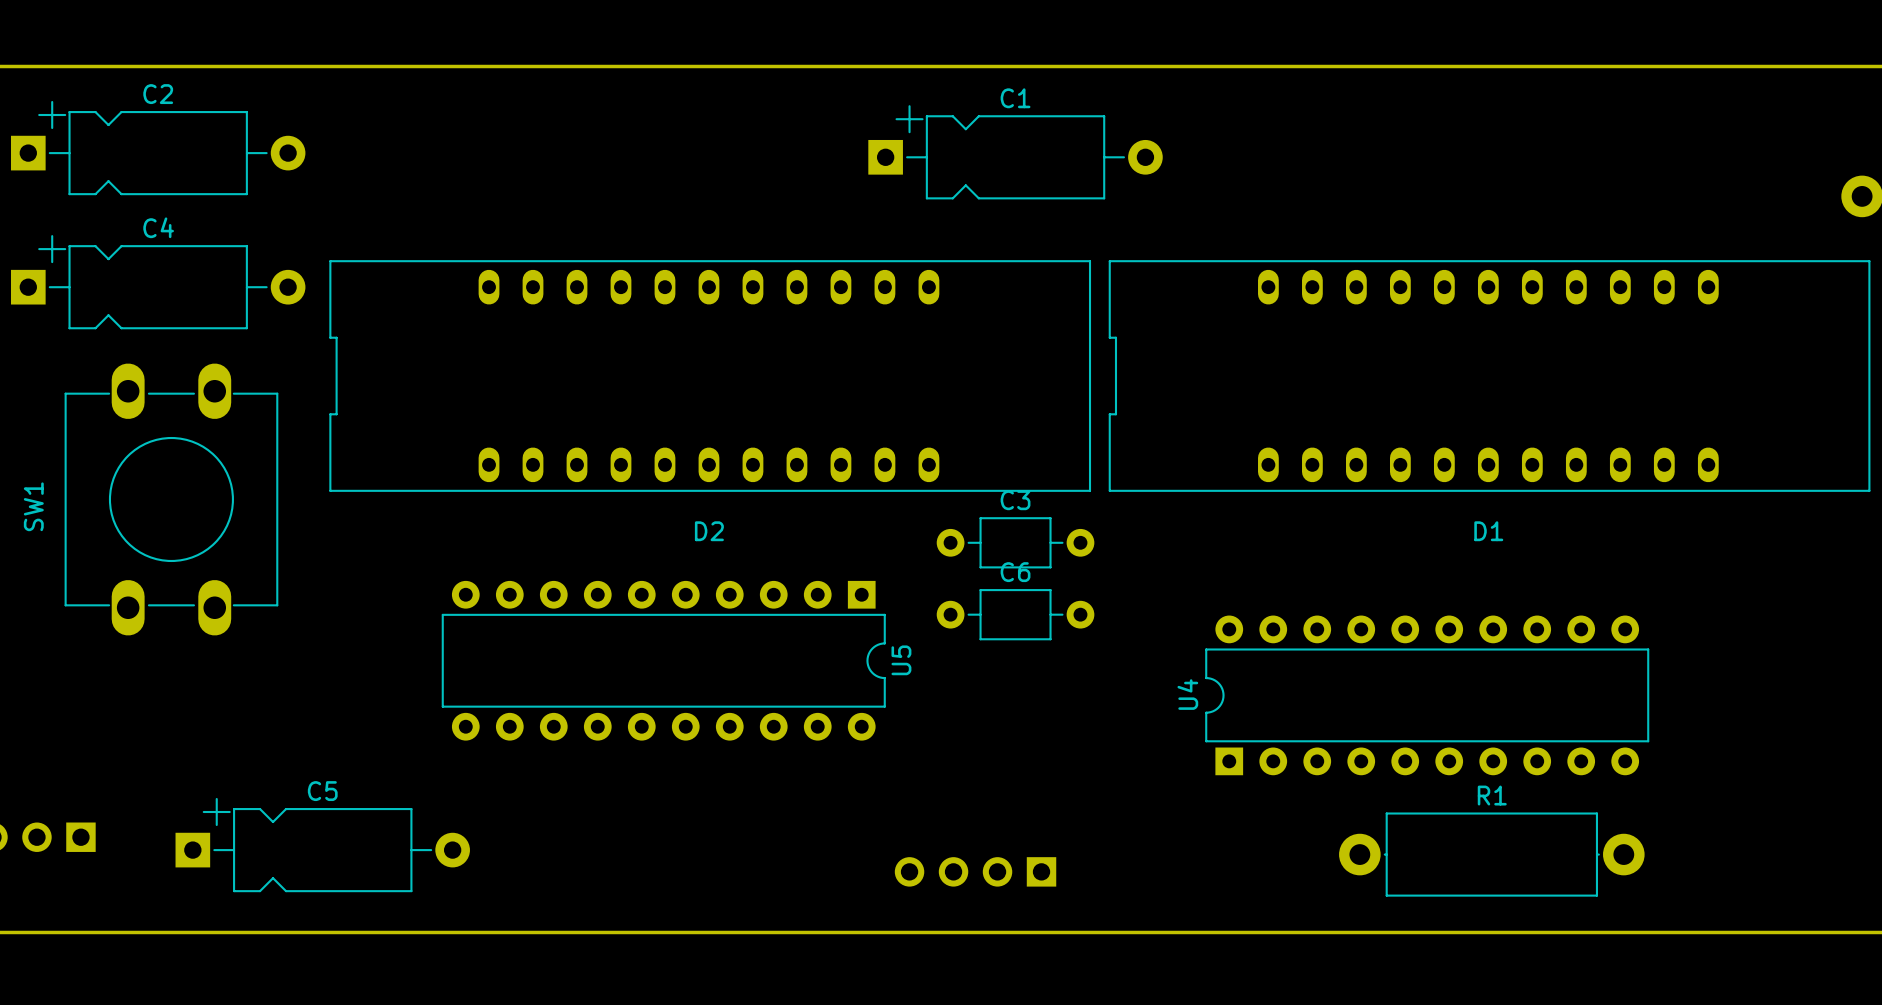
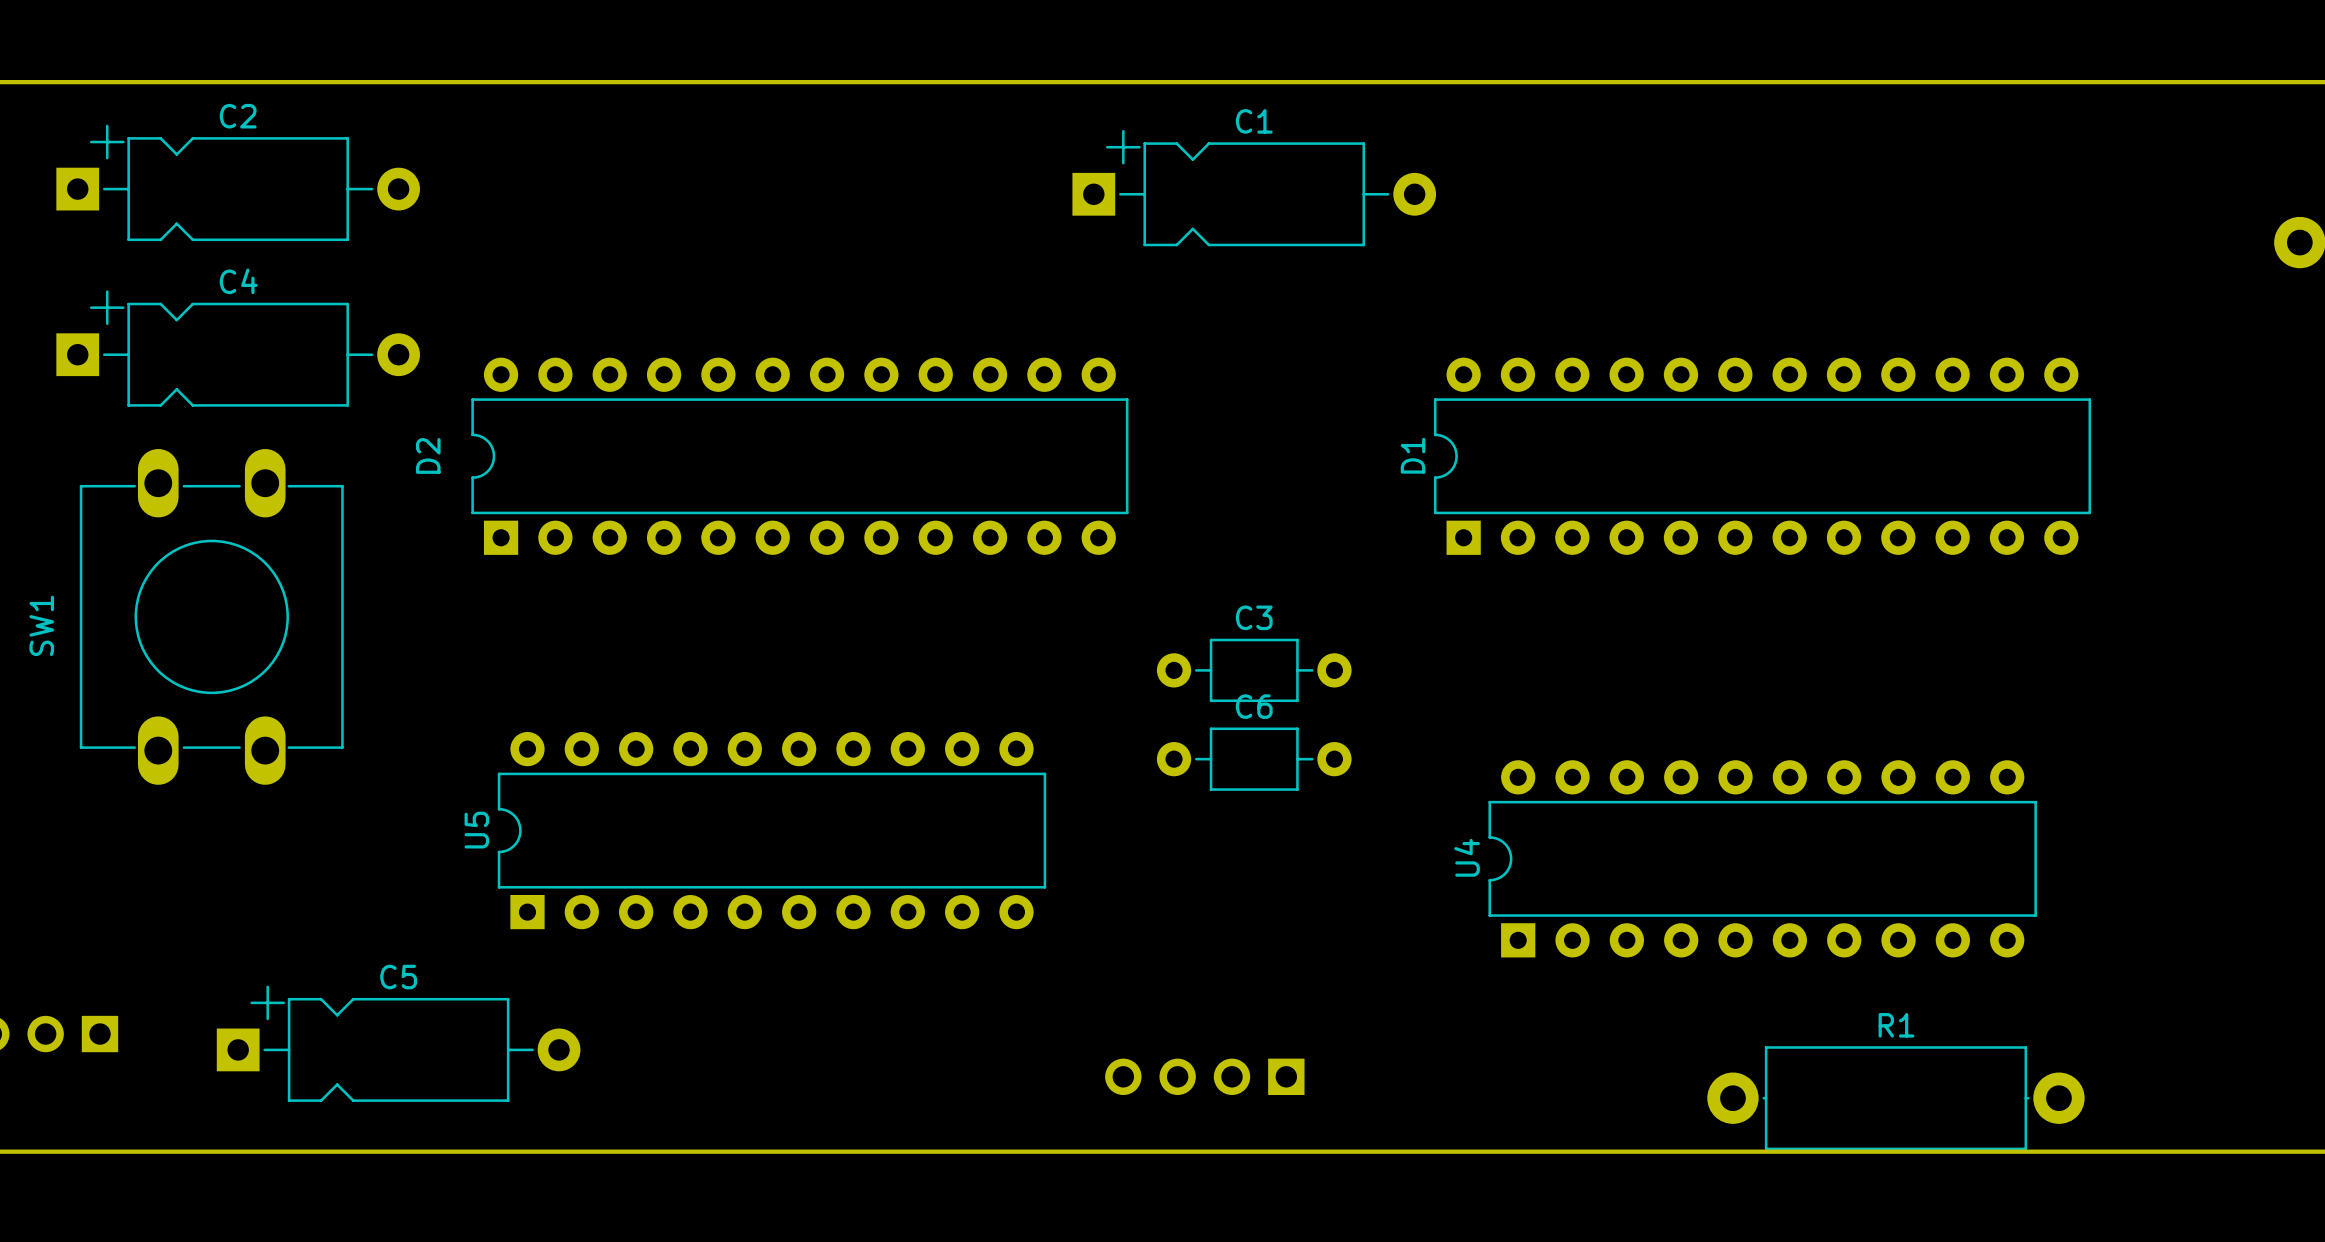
C2 position: (158, 148) -> (238, 182)
D2 footprint: [329, 260, 1092, 492] -> [471, 357, 1129, 555]
D1 footprint: [1108, 260, 1871, 492] -> [1433, 357, 2092, 555]
C4 position: (158, 282) -> (238, 348)
D2 name position: D2 (709, 531) -> D2 (428, 455)
D1 name position: D1 (1488, 531) -> D1 (1413, 455)
U5 rotation: 0° (663, 660) -> 180° (771, 830)
R1 position: (1491, 854) -> (1895, 1098)

